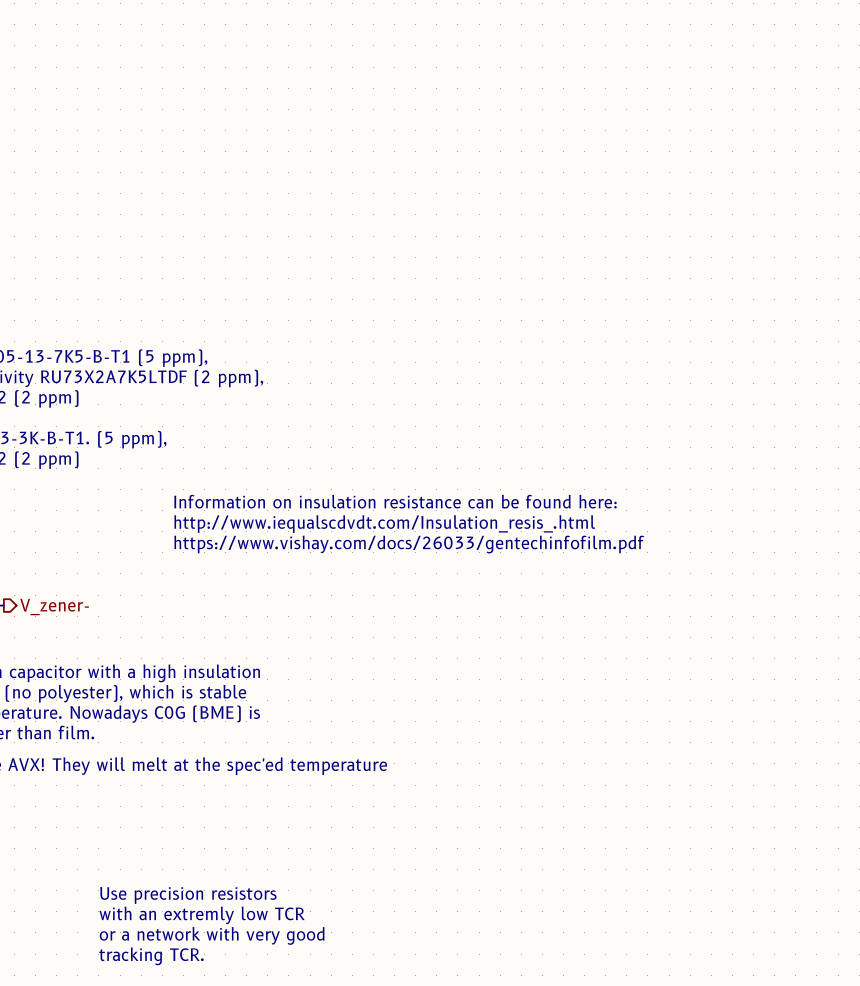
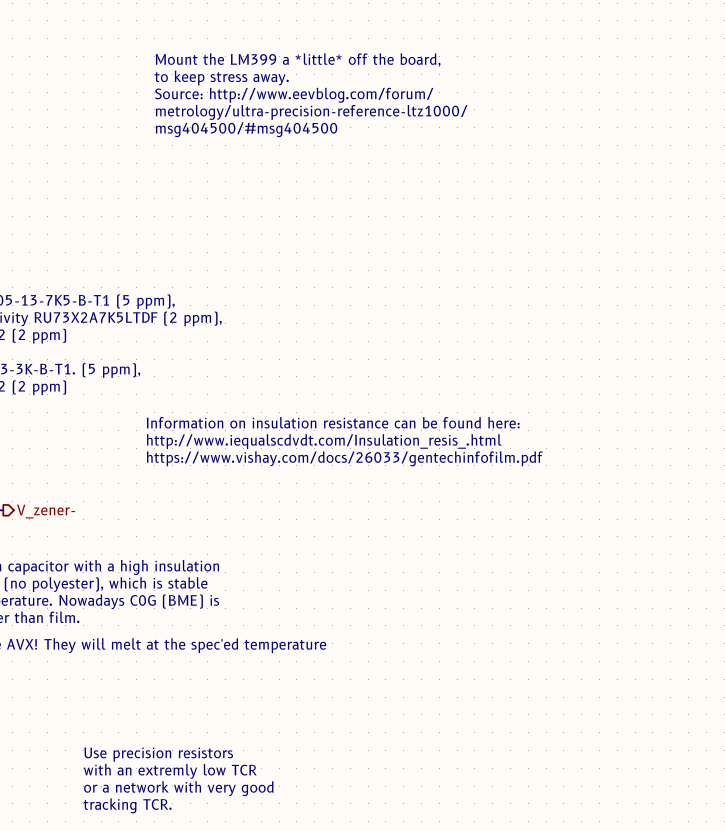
text: none -> Mount the LM399 a *little* off the board, (298, 60)
text: none -> to keep stress away. (221, 78)
text: none -> Source: http://www.eevblog.com/forum/ (294, 95)
text: none -> metrology/ultra-precision-reference-ltz1000/ (311, 112)
text: none -> msg404500/#msg404500 (246, 129)

